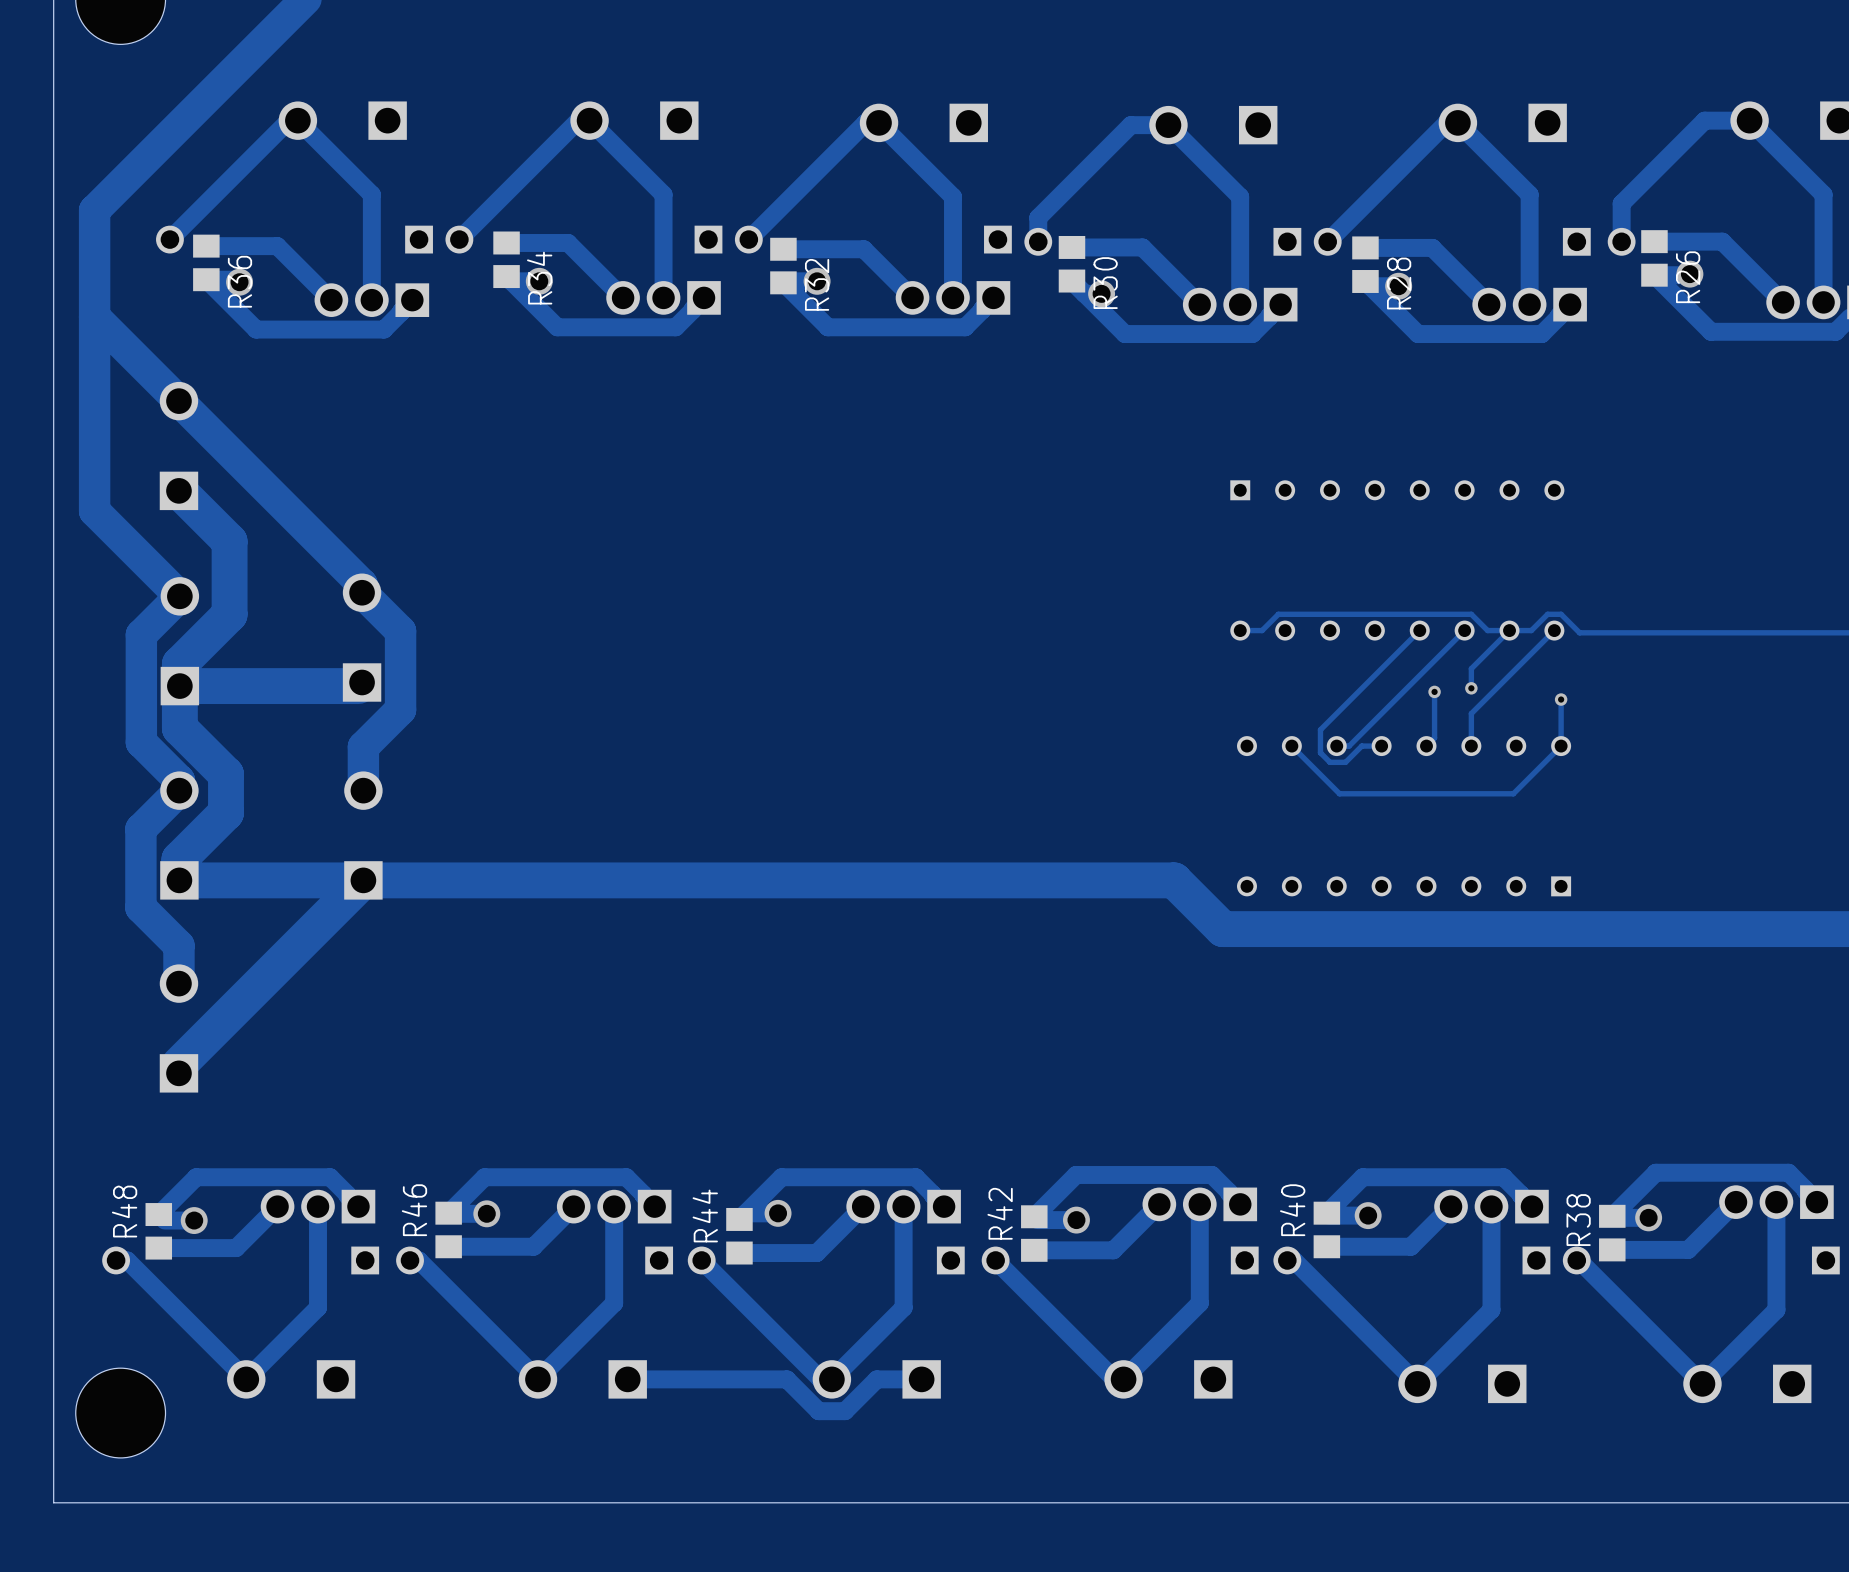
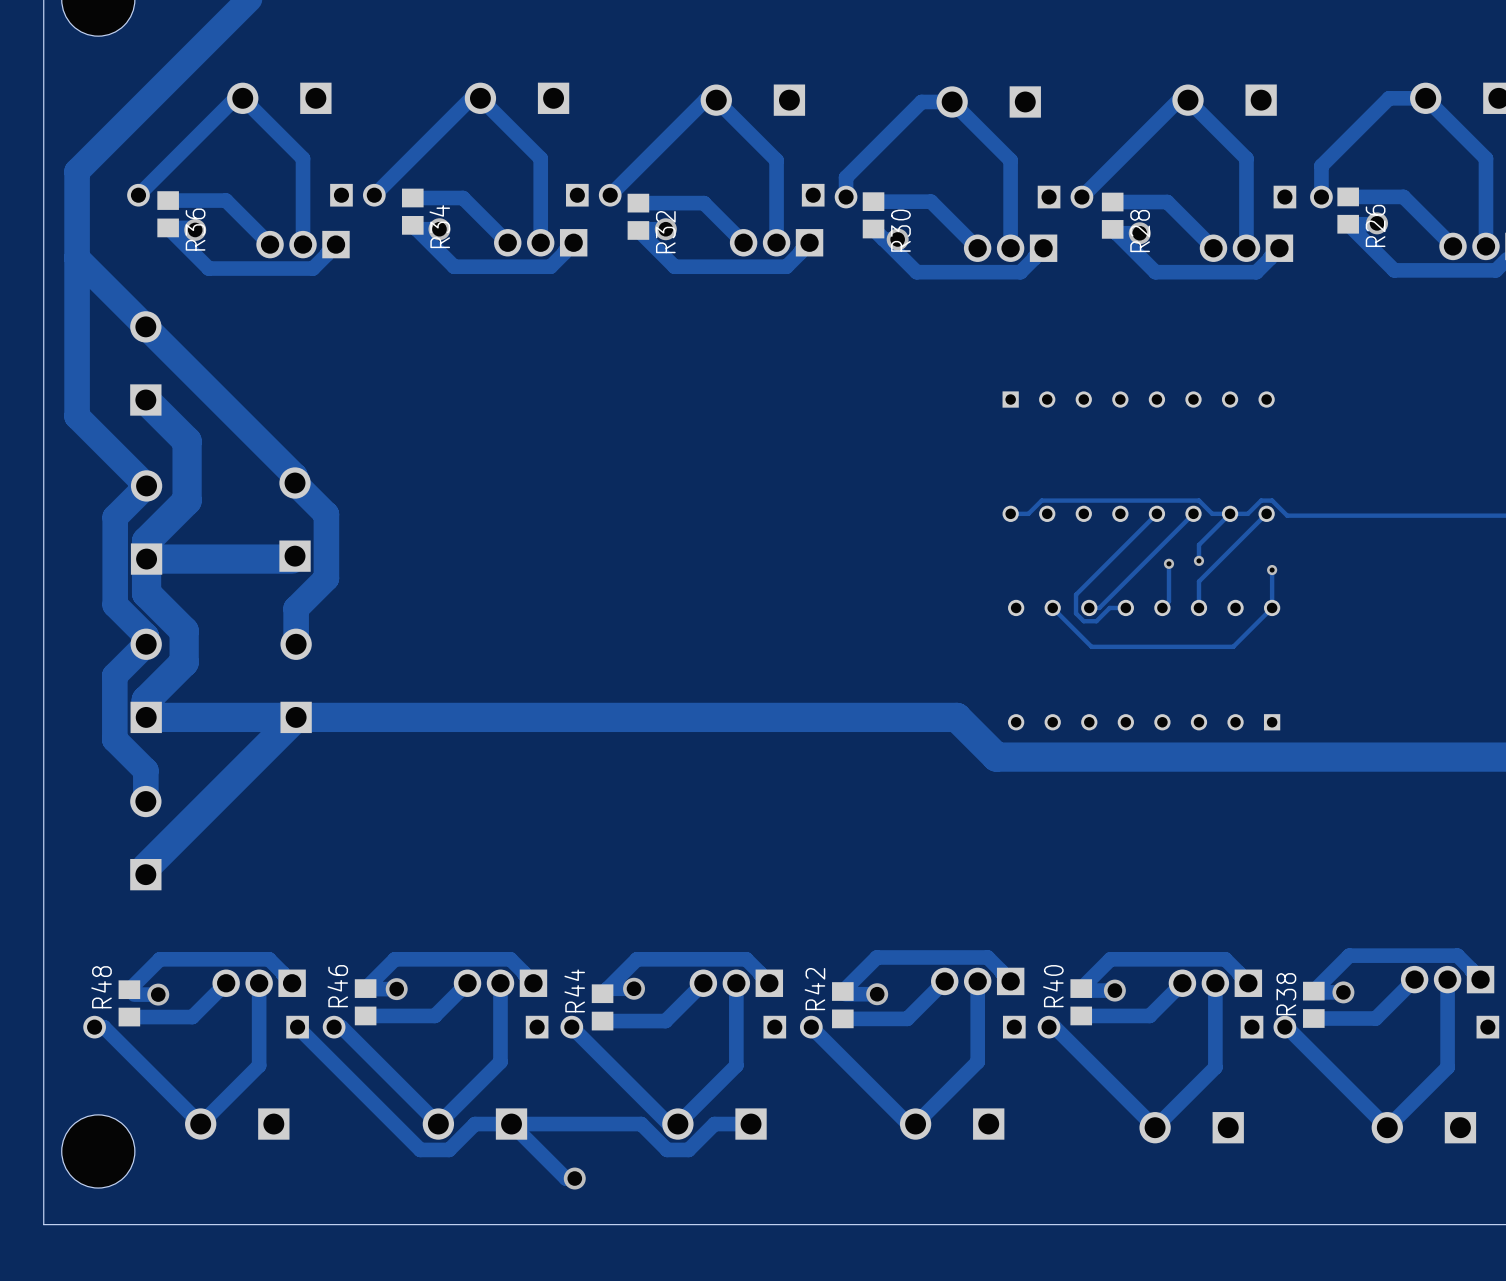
track: none -> (297, 1027) (420, 1149) (449, 1149) (475, 1124) (511, 1124) (566, 1178) (574, 1178)
via: none -> (574, 1178)

